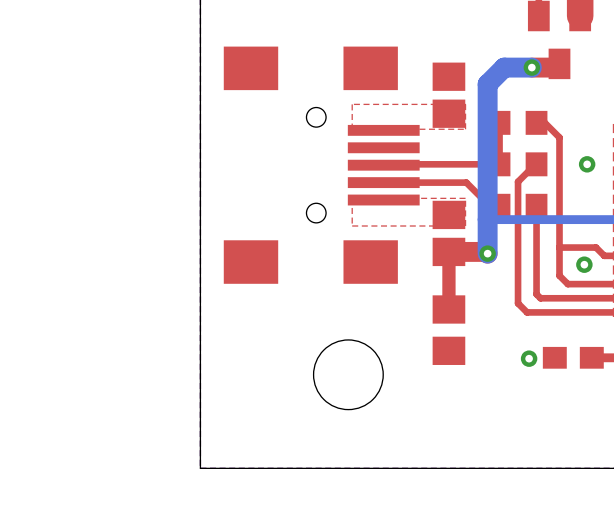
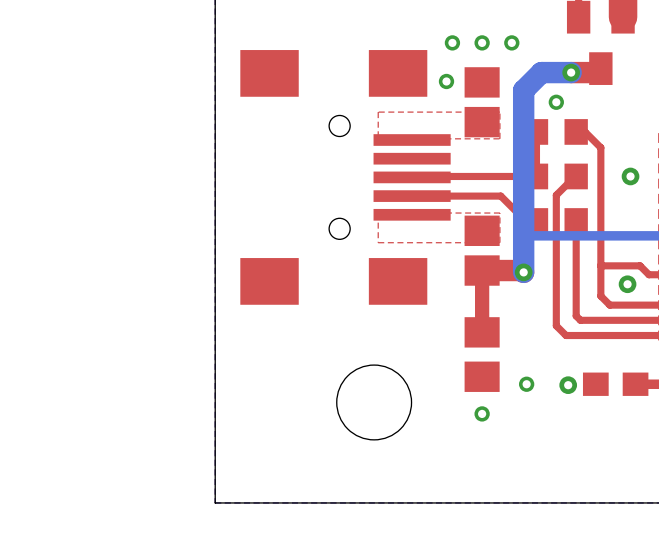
via: none -> (452, 42)
via: none -> (482, 42)
via: none -> (511, 42)
via: none -> (446, 81)
via: none -> (556, 102)
via: none -> (526, 384)
via: none -> (482, 413)

